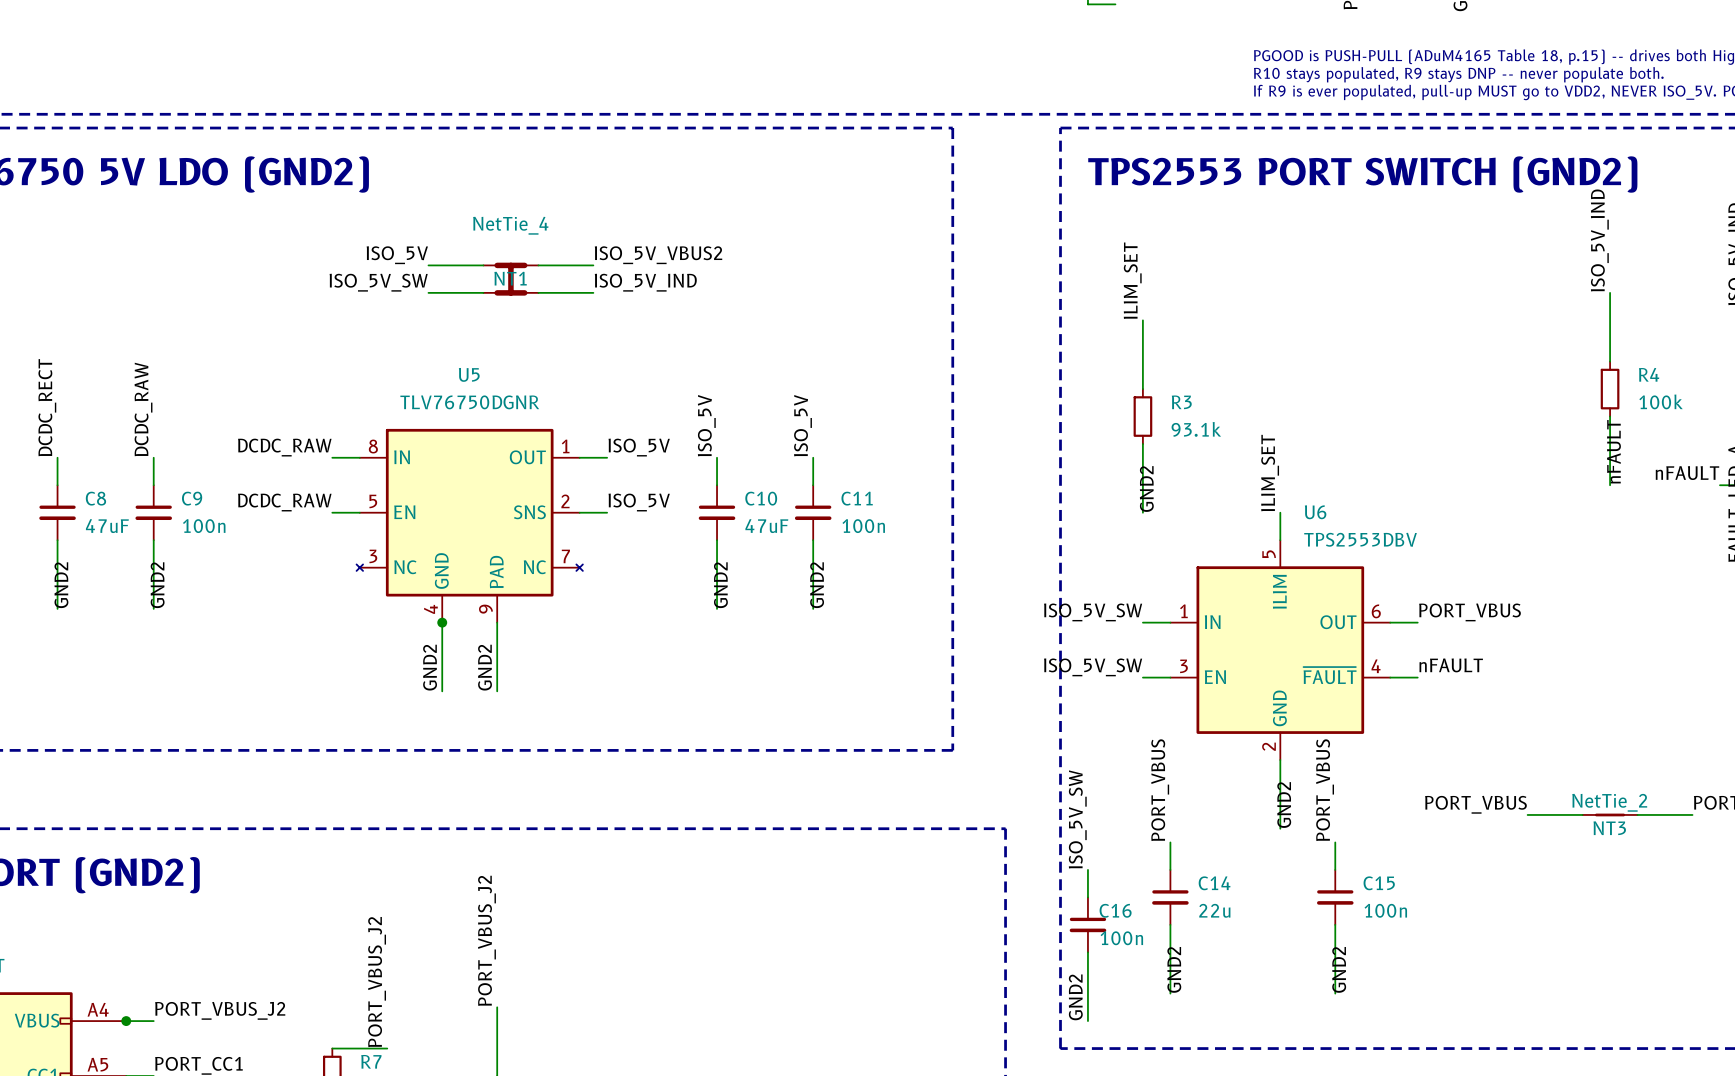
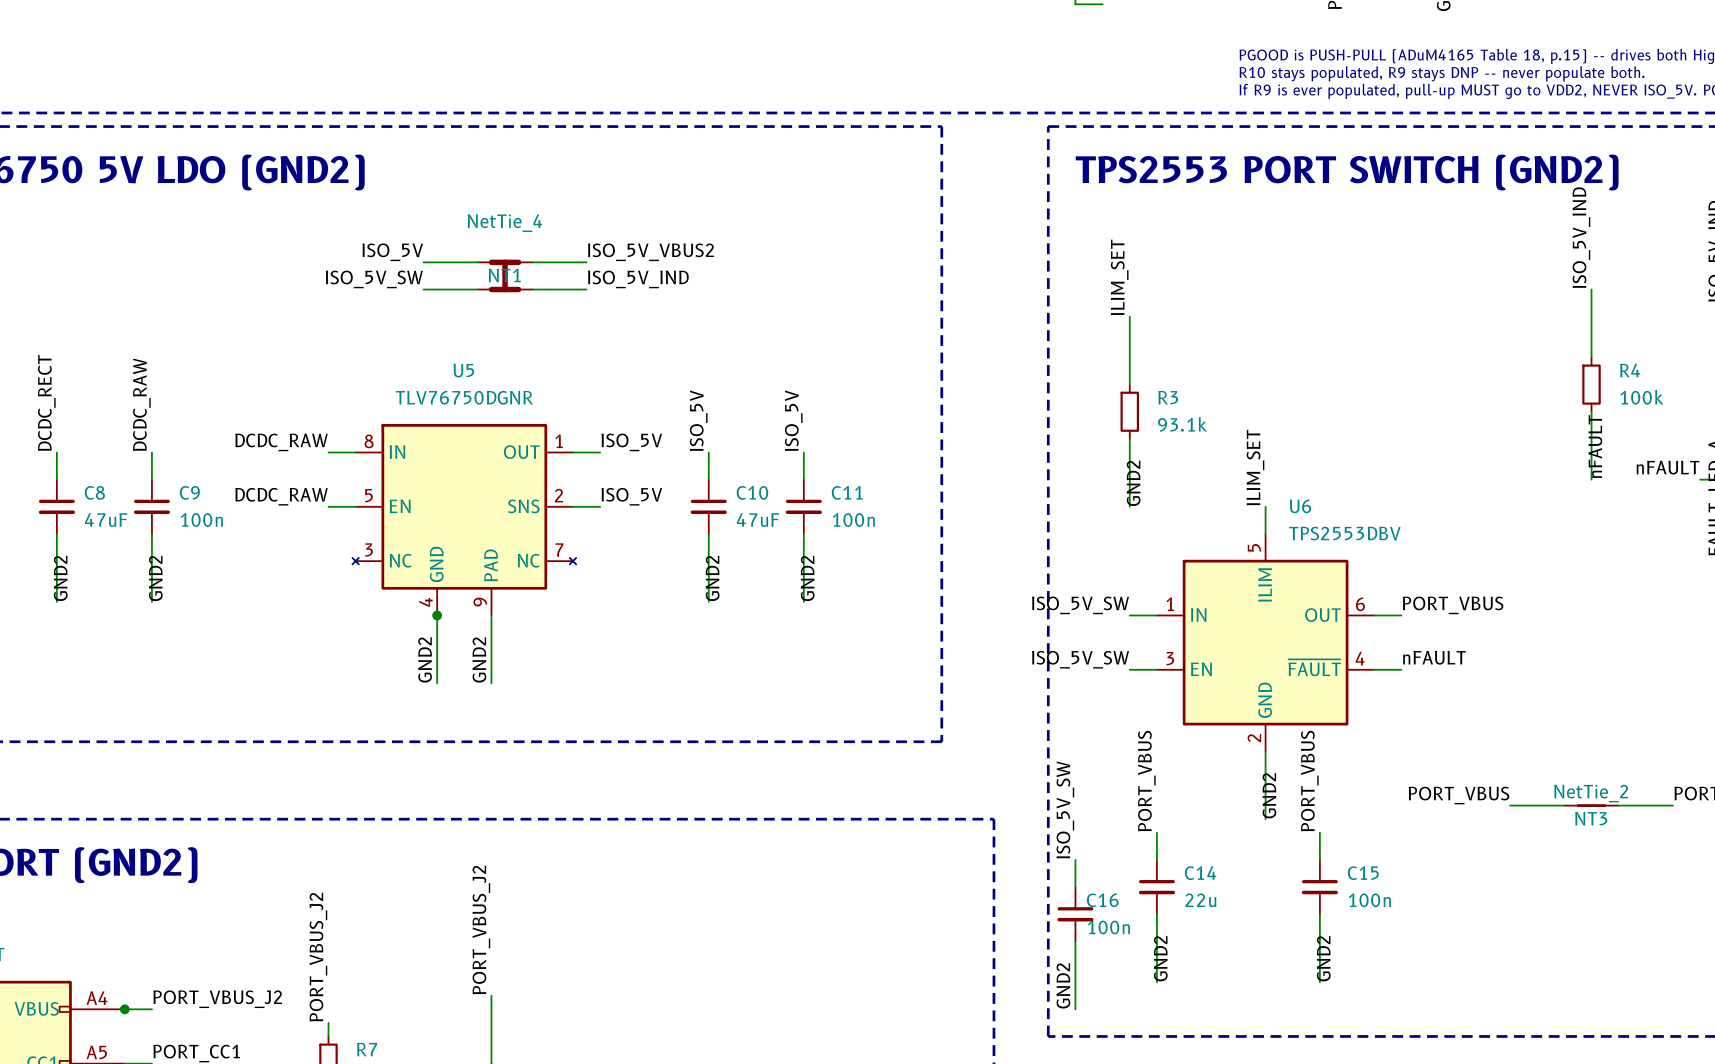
label position: PORT_VBUS_J2 (377, 982) -> PORT_VBUS_J2 (318, 957)
wire: (332, 1048) (387, 1048) -> (328, 1036) (328, 1022)

